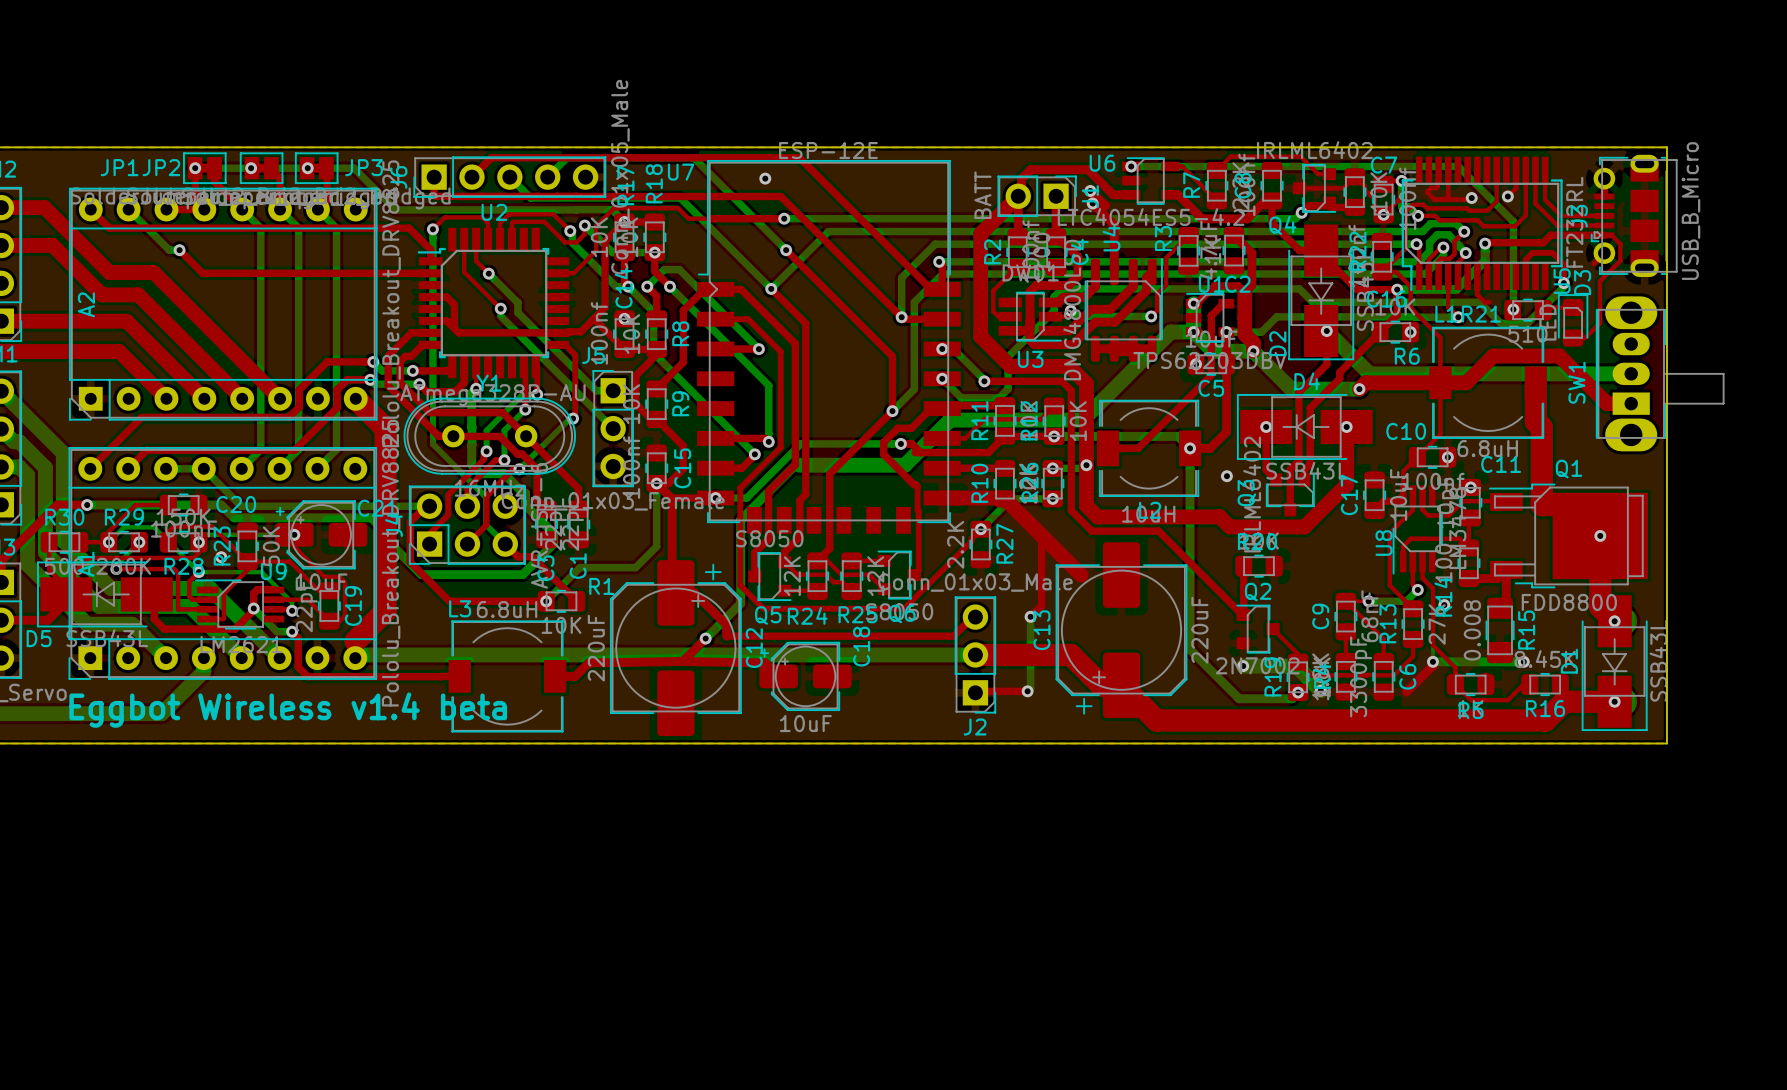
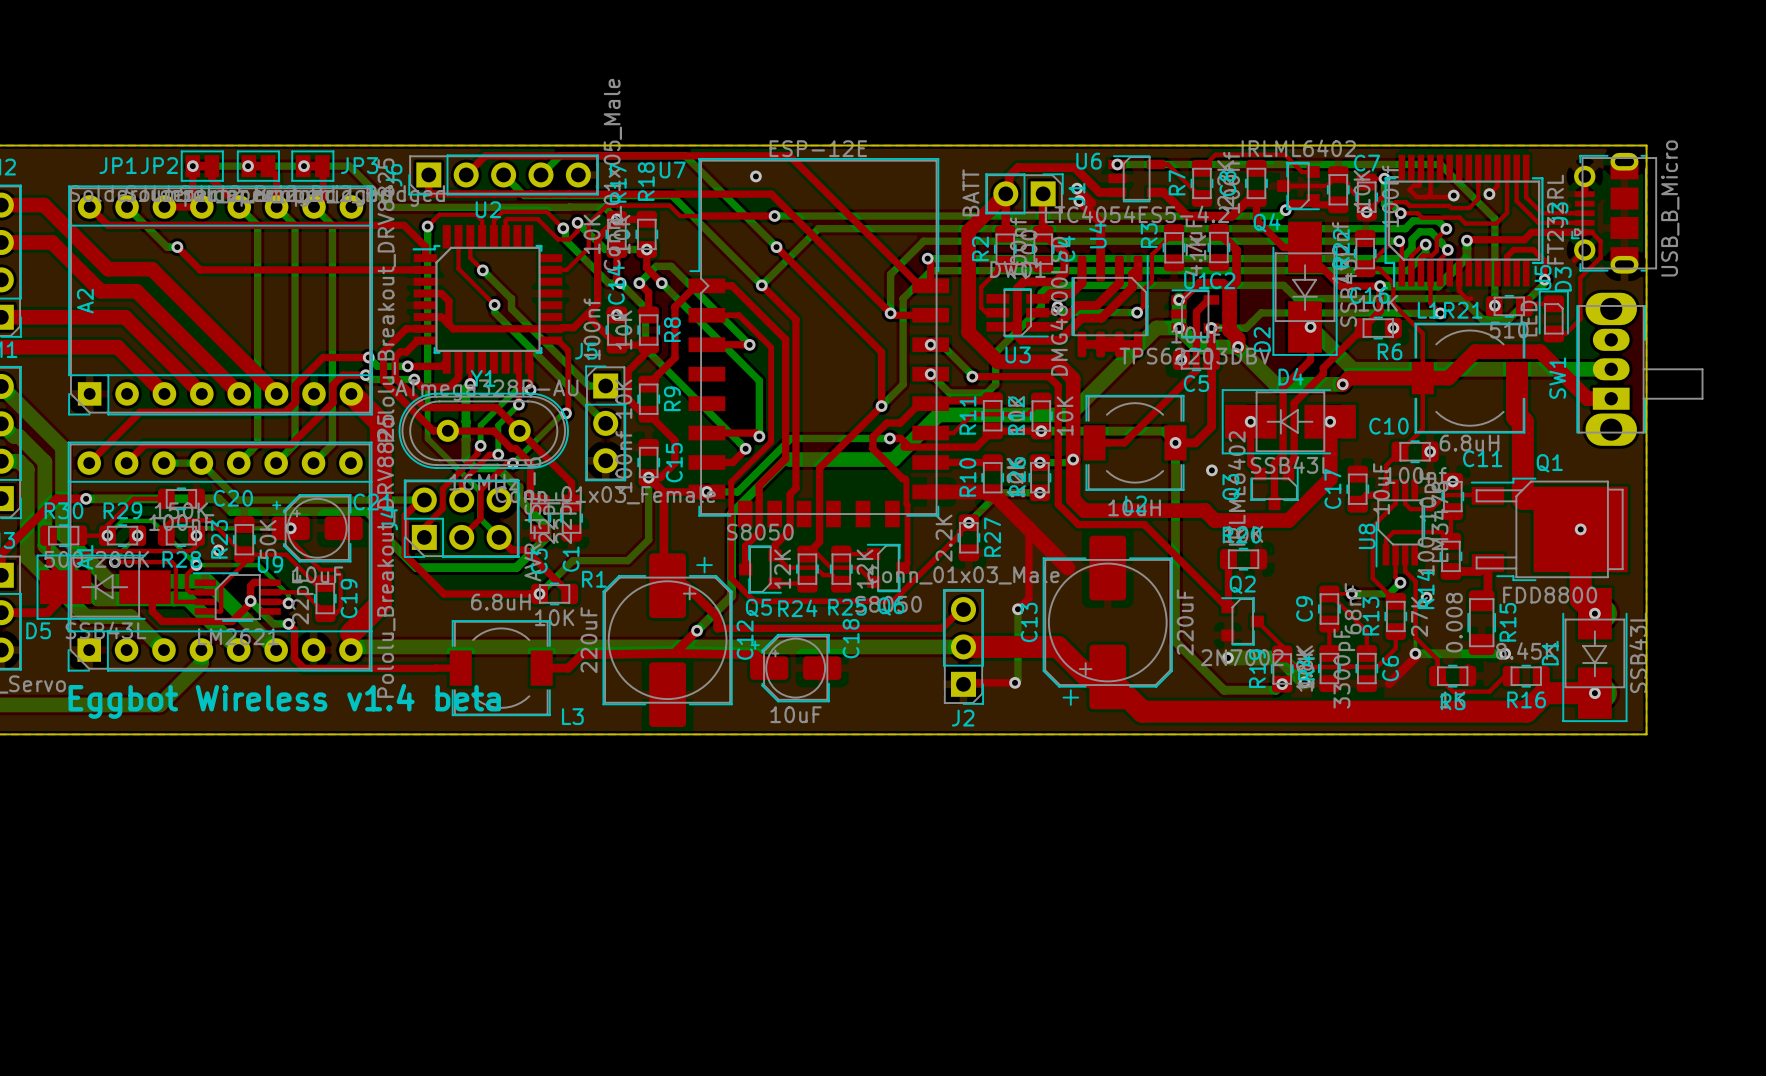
L3 name position: L3 (460, 608) -> L3 (572, 716)
L3 footprint: [448, 620, 567, 733] -> [449, 620, 553, 717]

